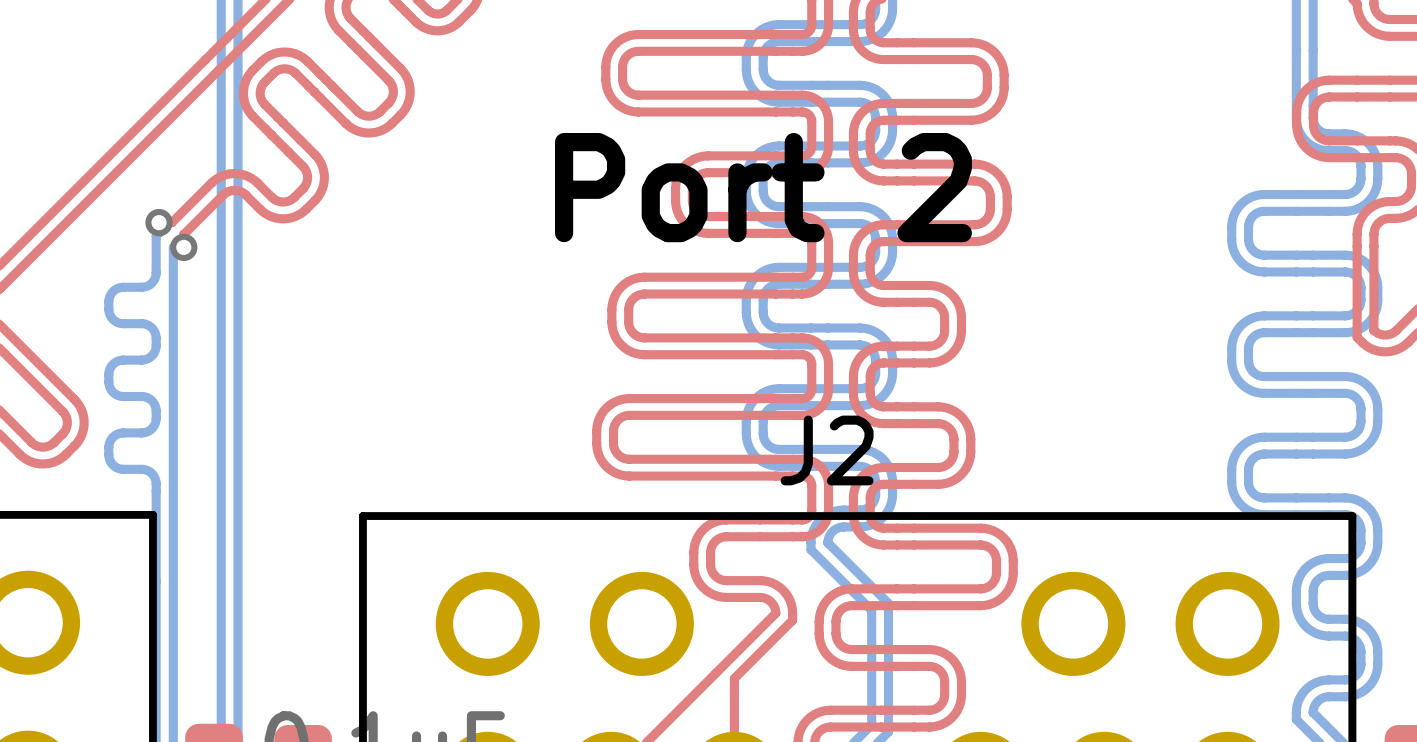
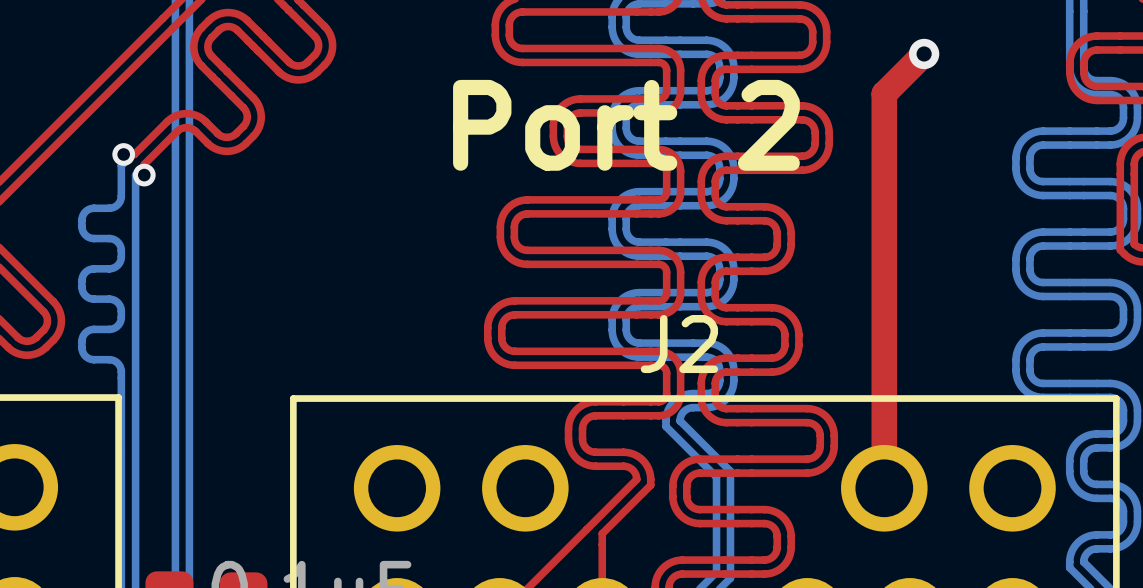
top track: none -> (924, 53) (884, 93) (884, 488)
via: none -> (924, 53)

